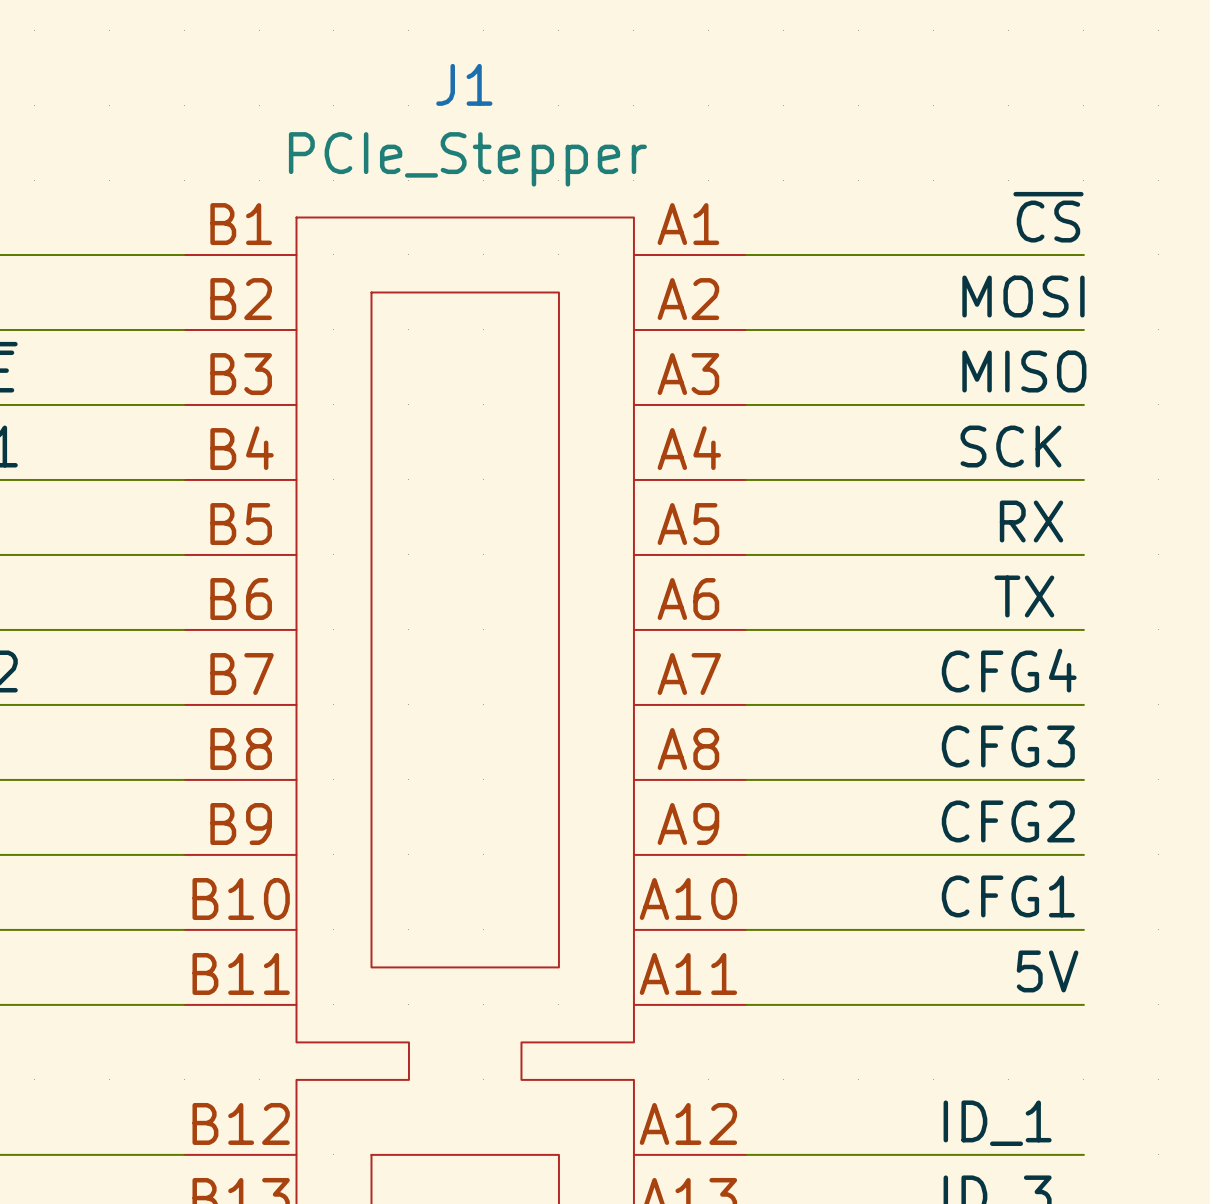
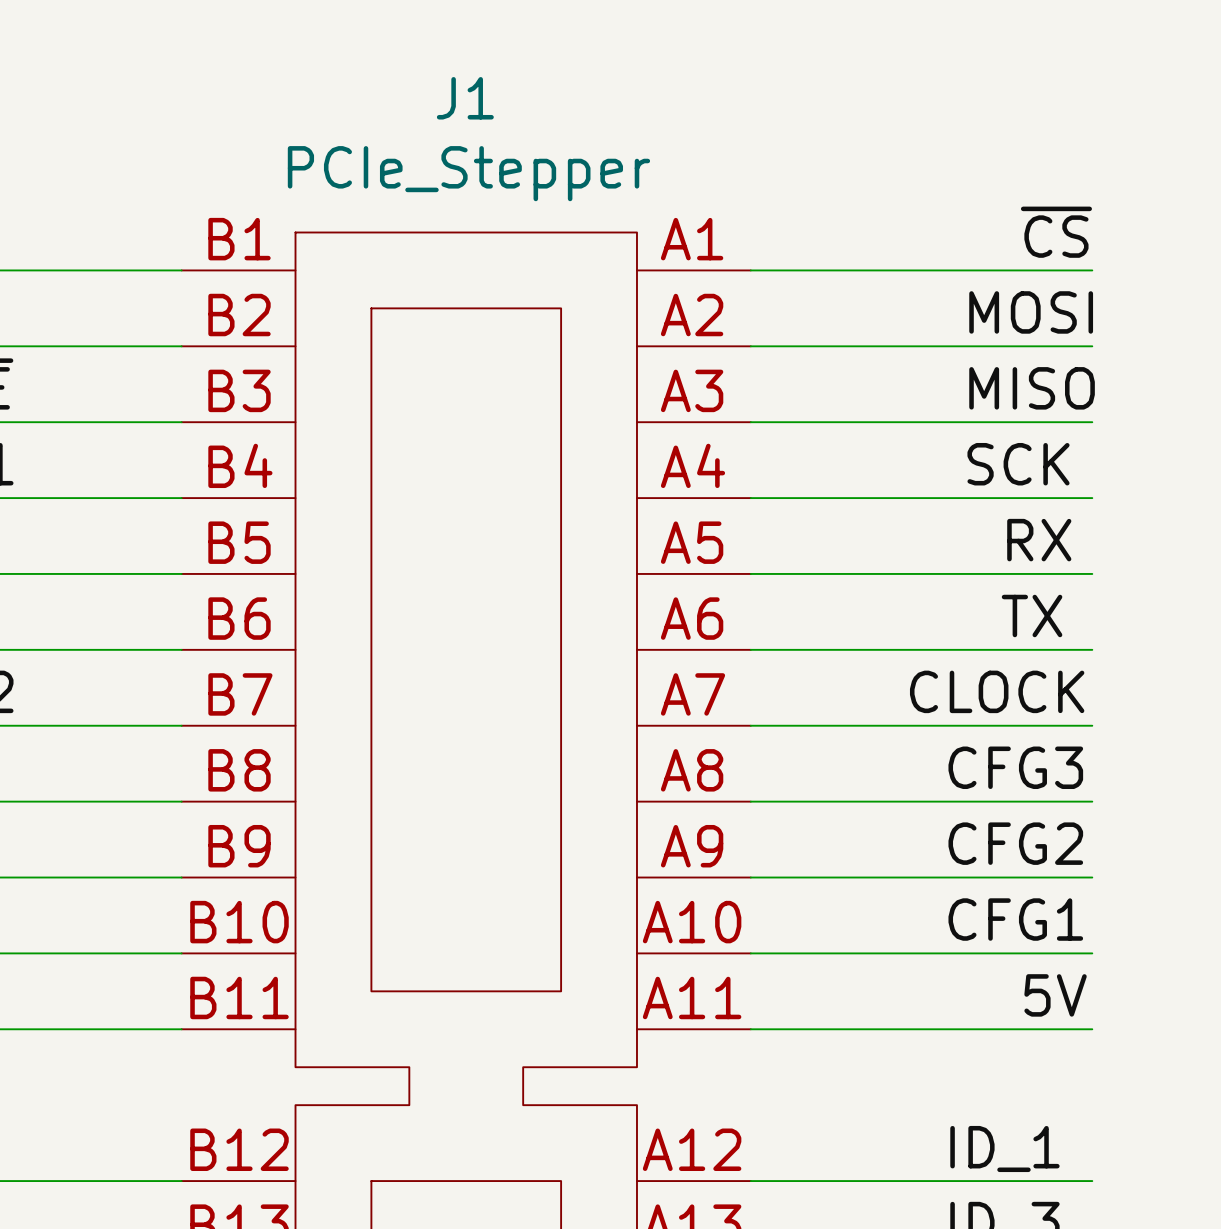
label: CFG4 (1009, 670) -> none
label: none -> CLOCK (997, 691)

